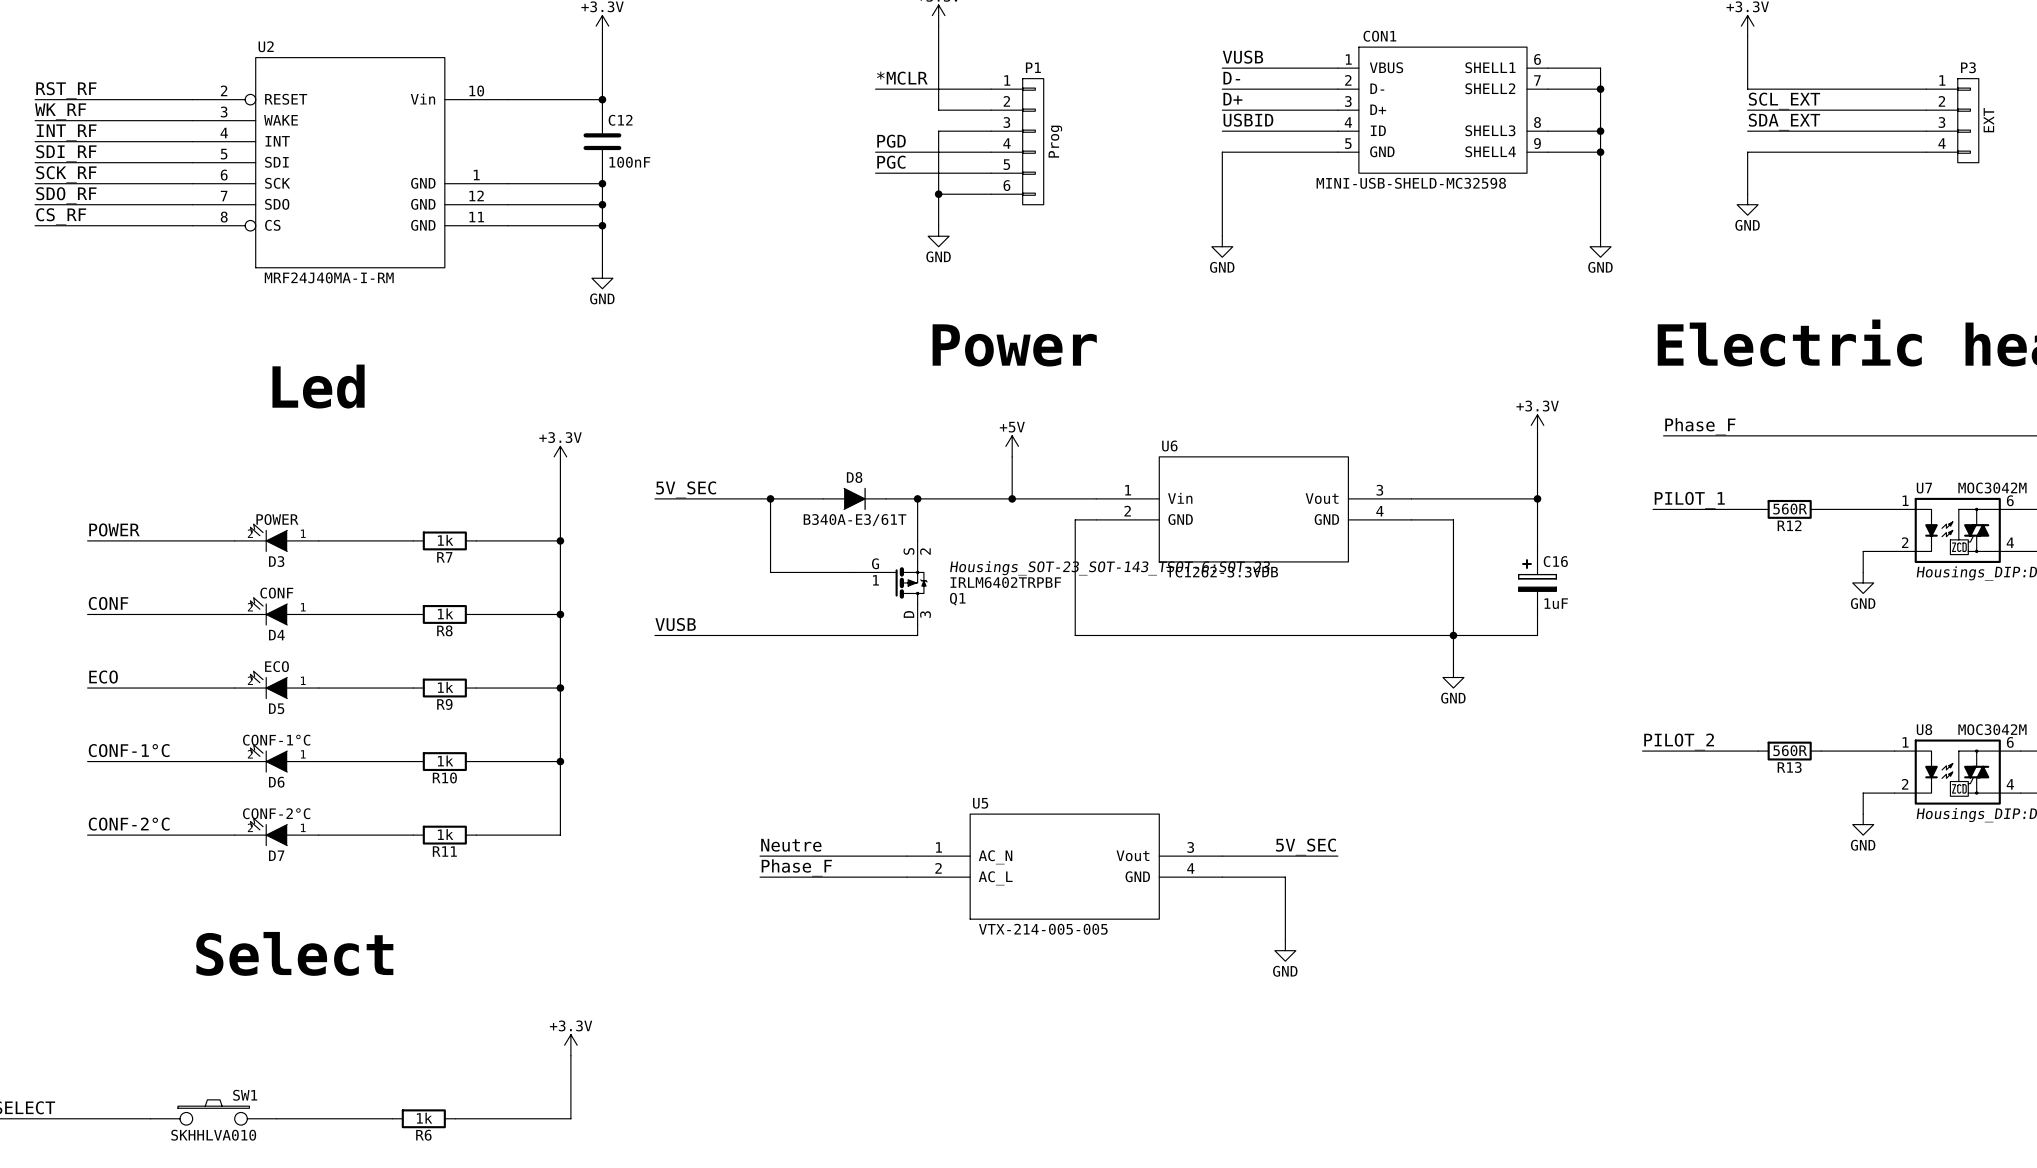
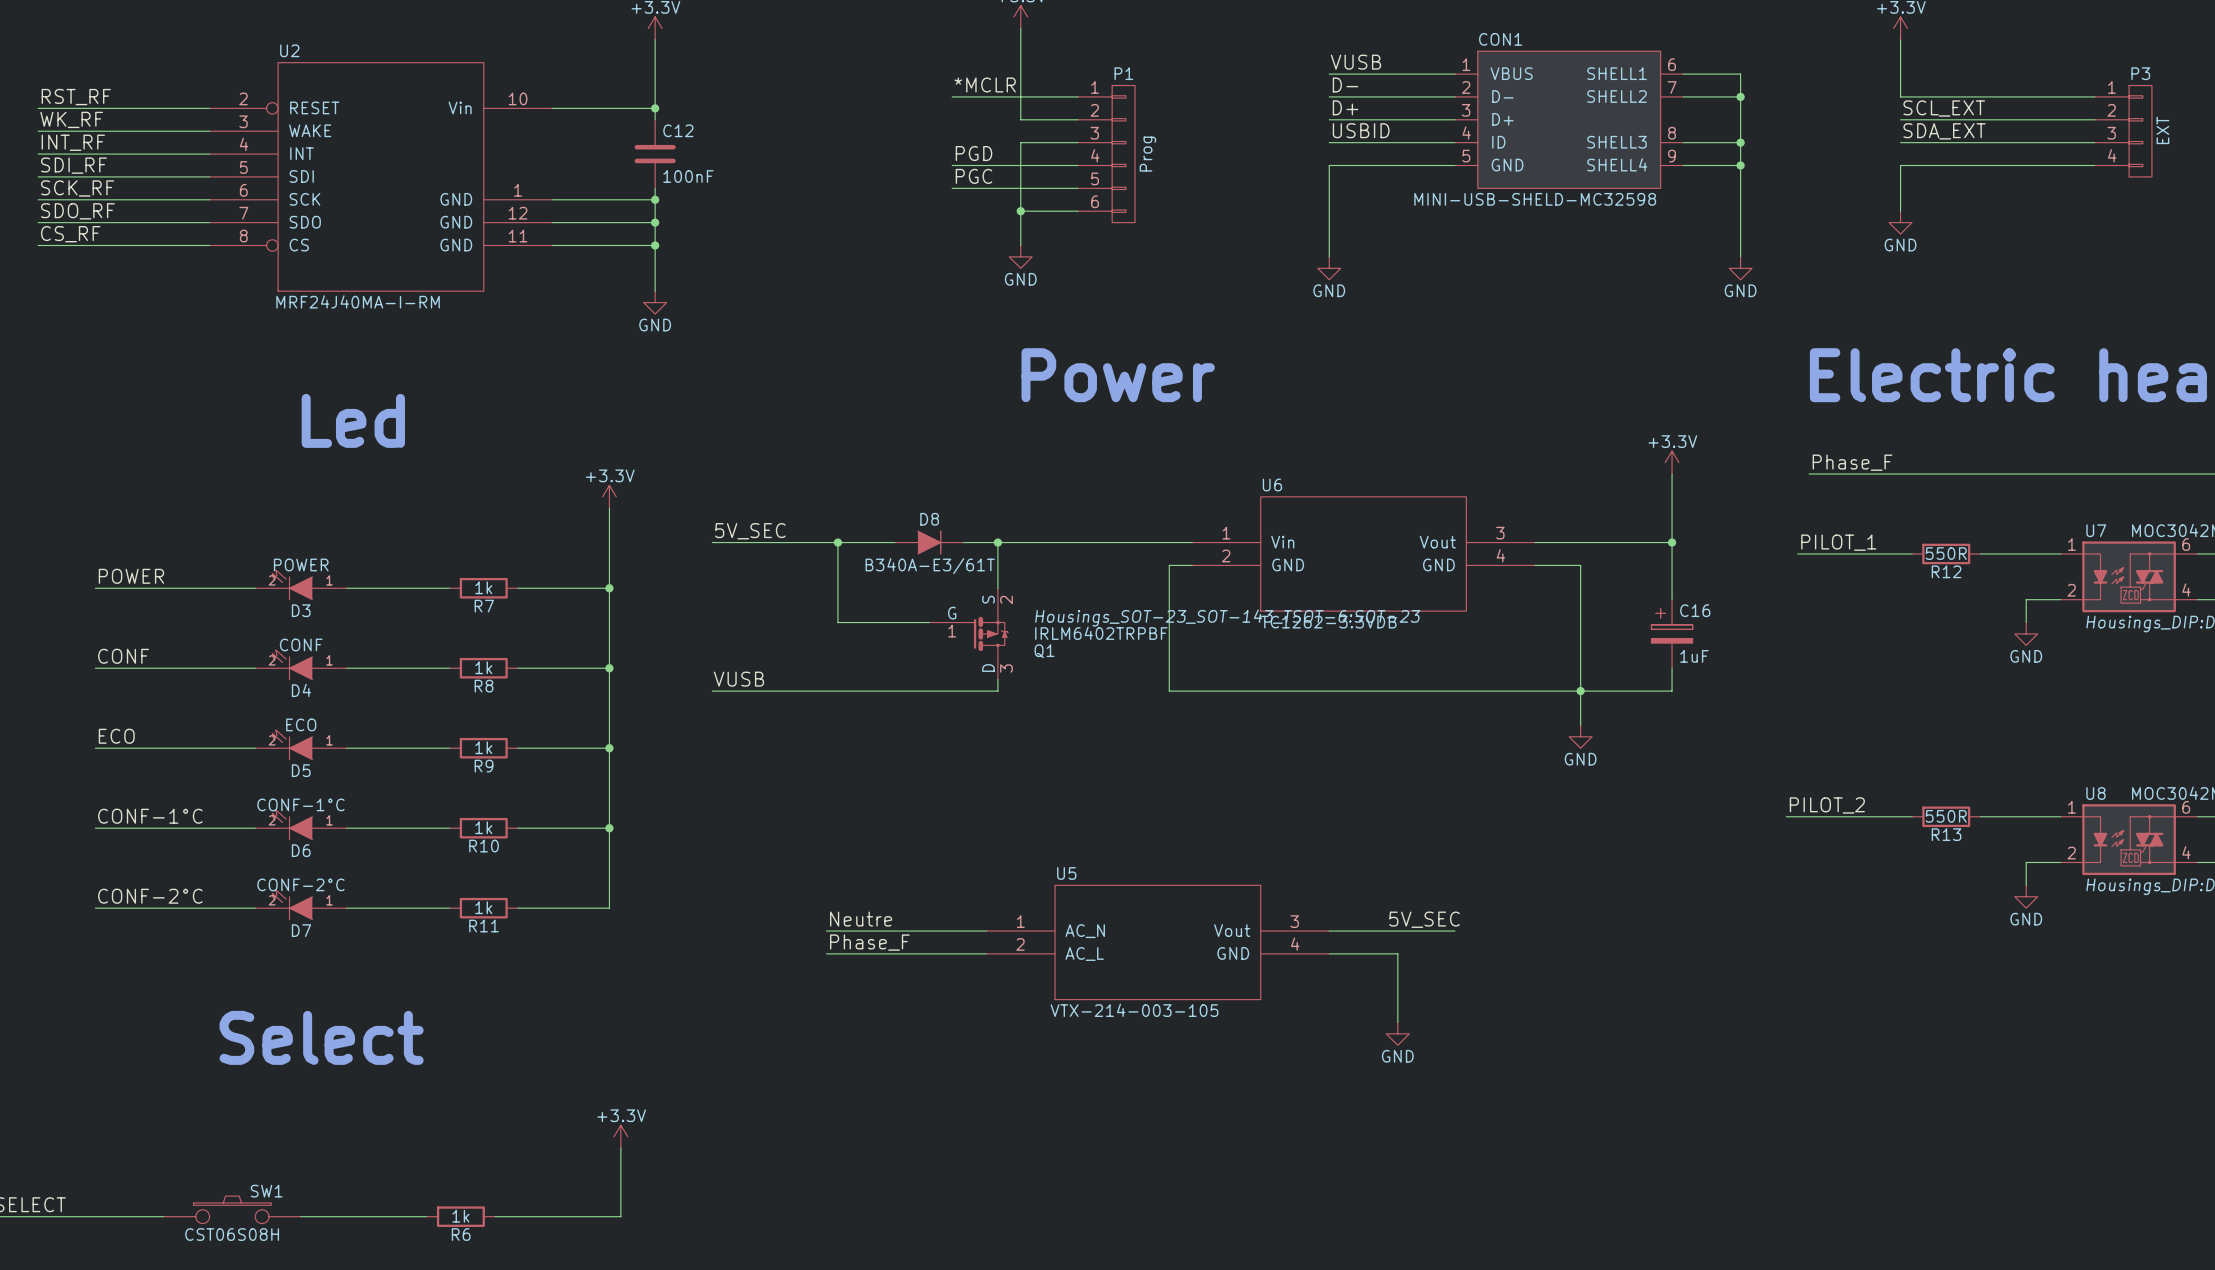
power symbol: +5V (1012, 446) -> none
wire: (1012, 456) (1012, 498) -> none
junction: (1012, 498) -> none
R12 value: 560R (1790, 509) -> 550R (1946, 553)
R13 value: 560R (1790, 750) -> 550R (1946, 816)
U5 value: VTX-214-005-005 (1043, 929) -> VTX-214-003-105 (1134, 1010)
SW1 value: SKHHLVA010 (213, 1135) -> CST06S08H (232, 1234)

